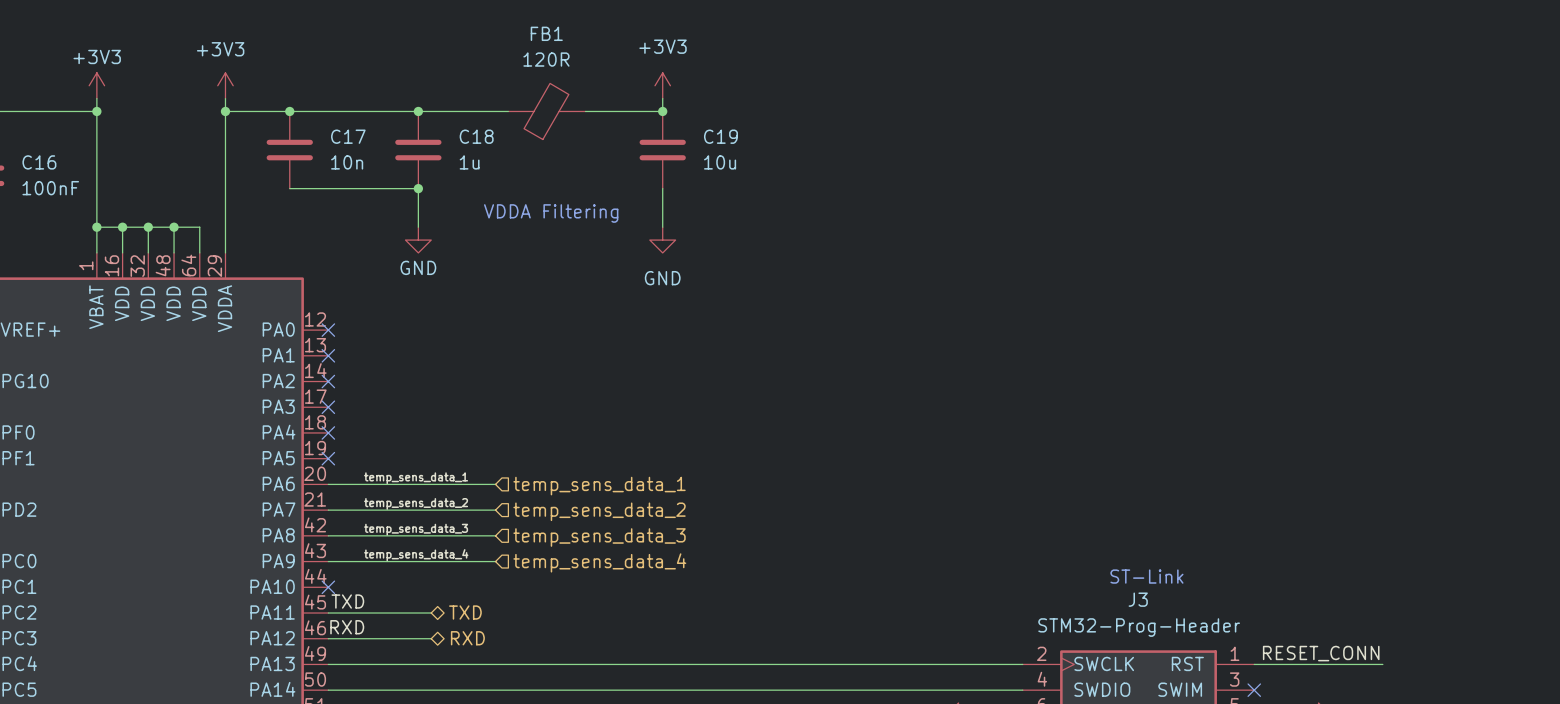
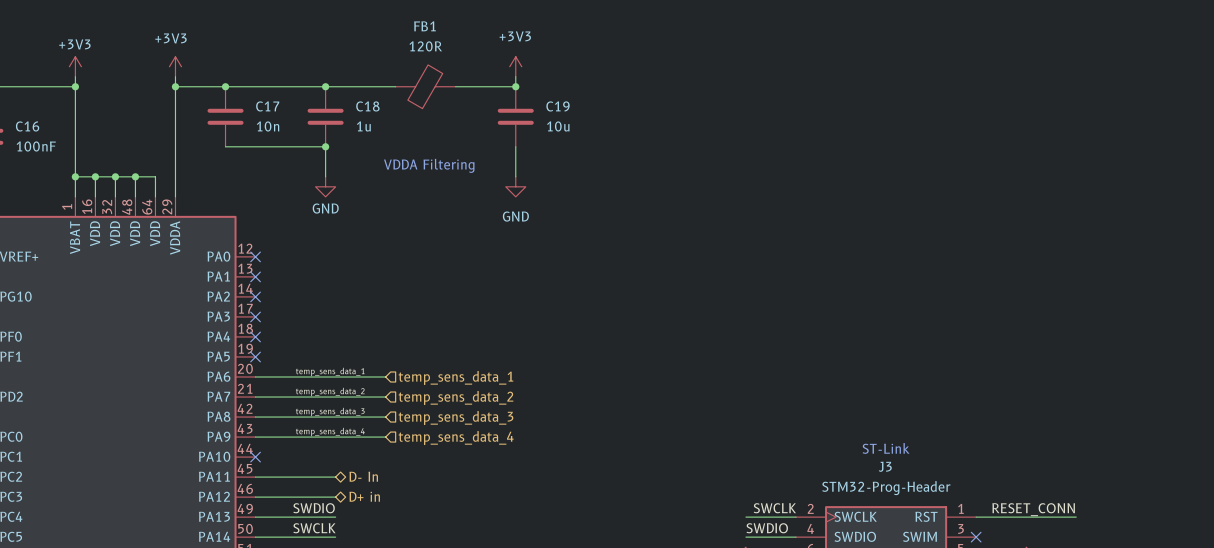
label: TXD (347, 601) -> none
hierarchical label: TXD (465, 612) -> D- In (363, 476)
label: RXD (347, 627) -> none
hierarchical label: RXD (467, 638) -> D+ in (364, 496)
label: none -> SWDIO (314, 508)
label: none -> SWCLK (774, 508)
wire: (431, 664) (958, 664) -> none
label: none -> SWCLK (314, 528)
label: none -> SWDIO (767, 528)
wire: (431, 690) (958, 690) -> none

